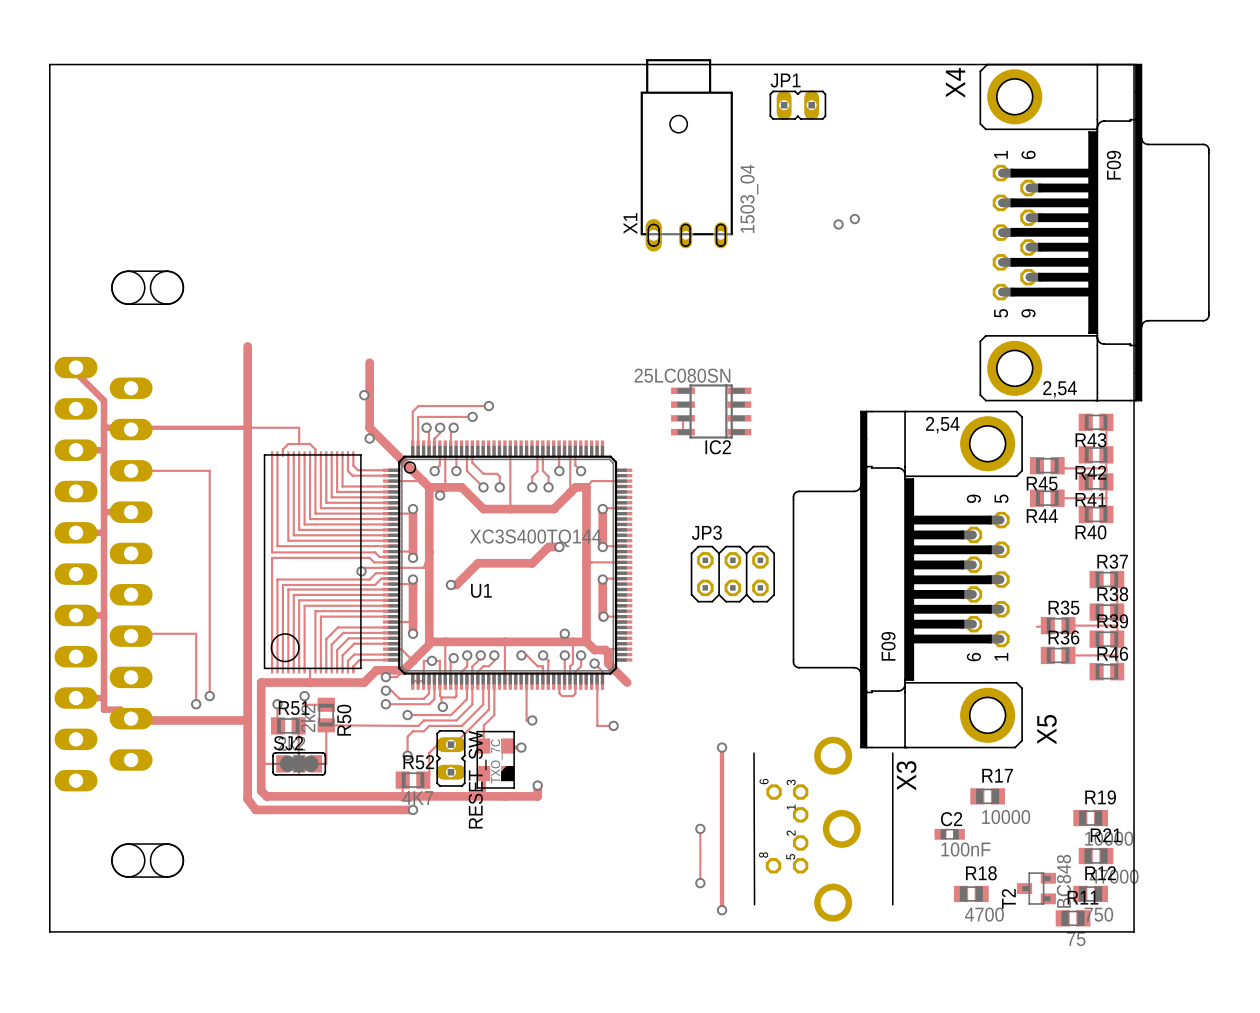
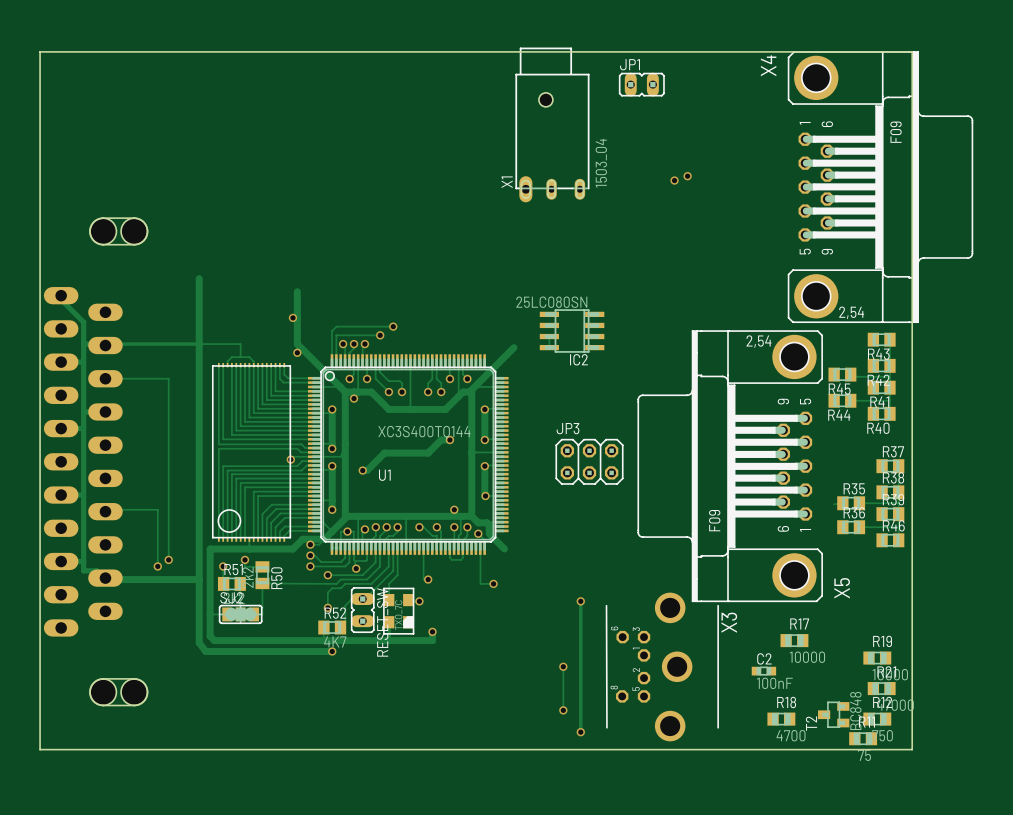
track: none -> (514, 347) (469, 392)

